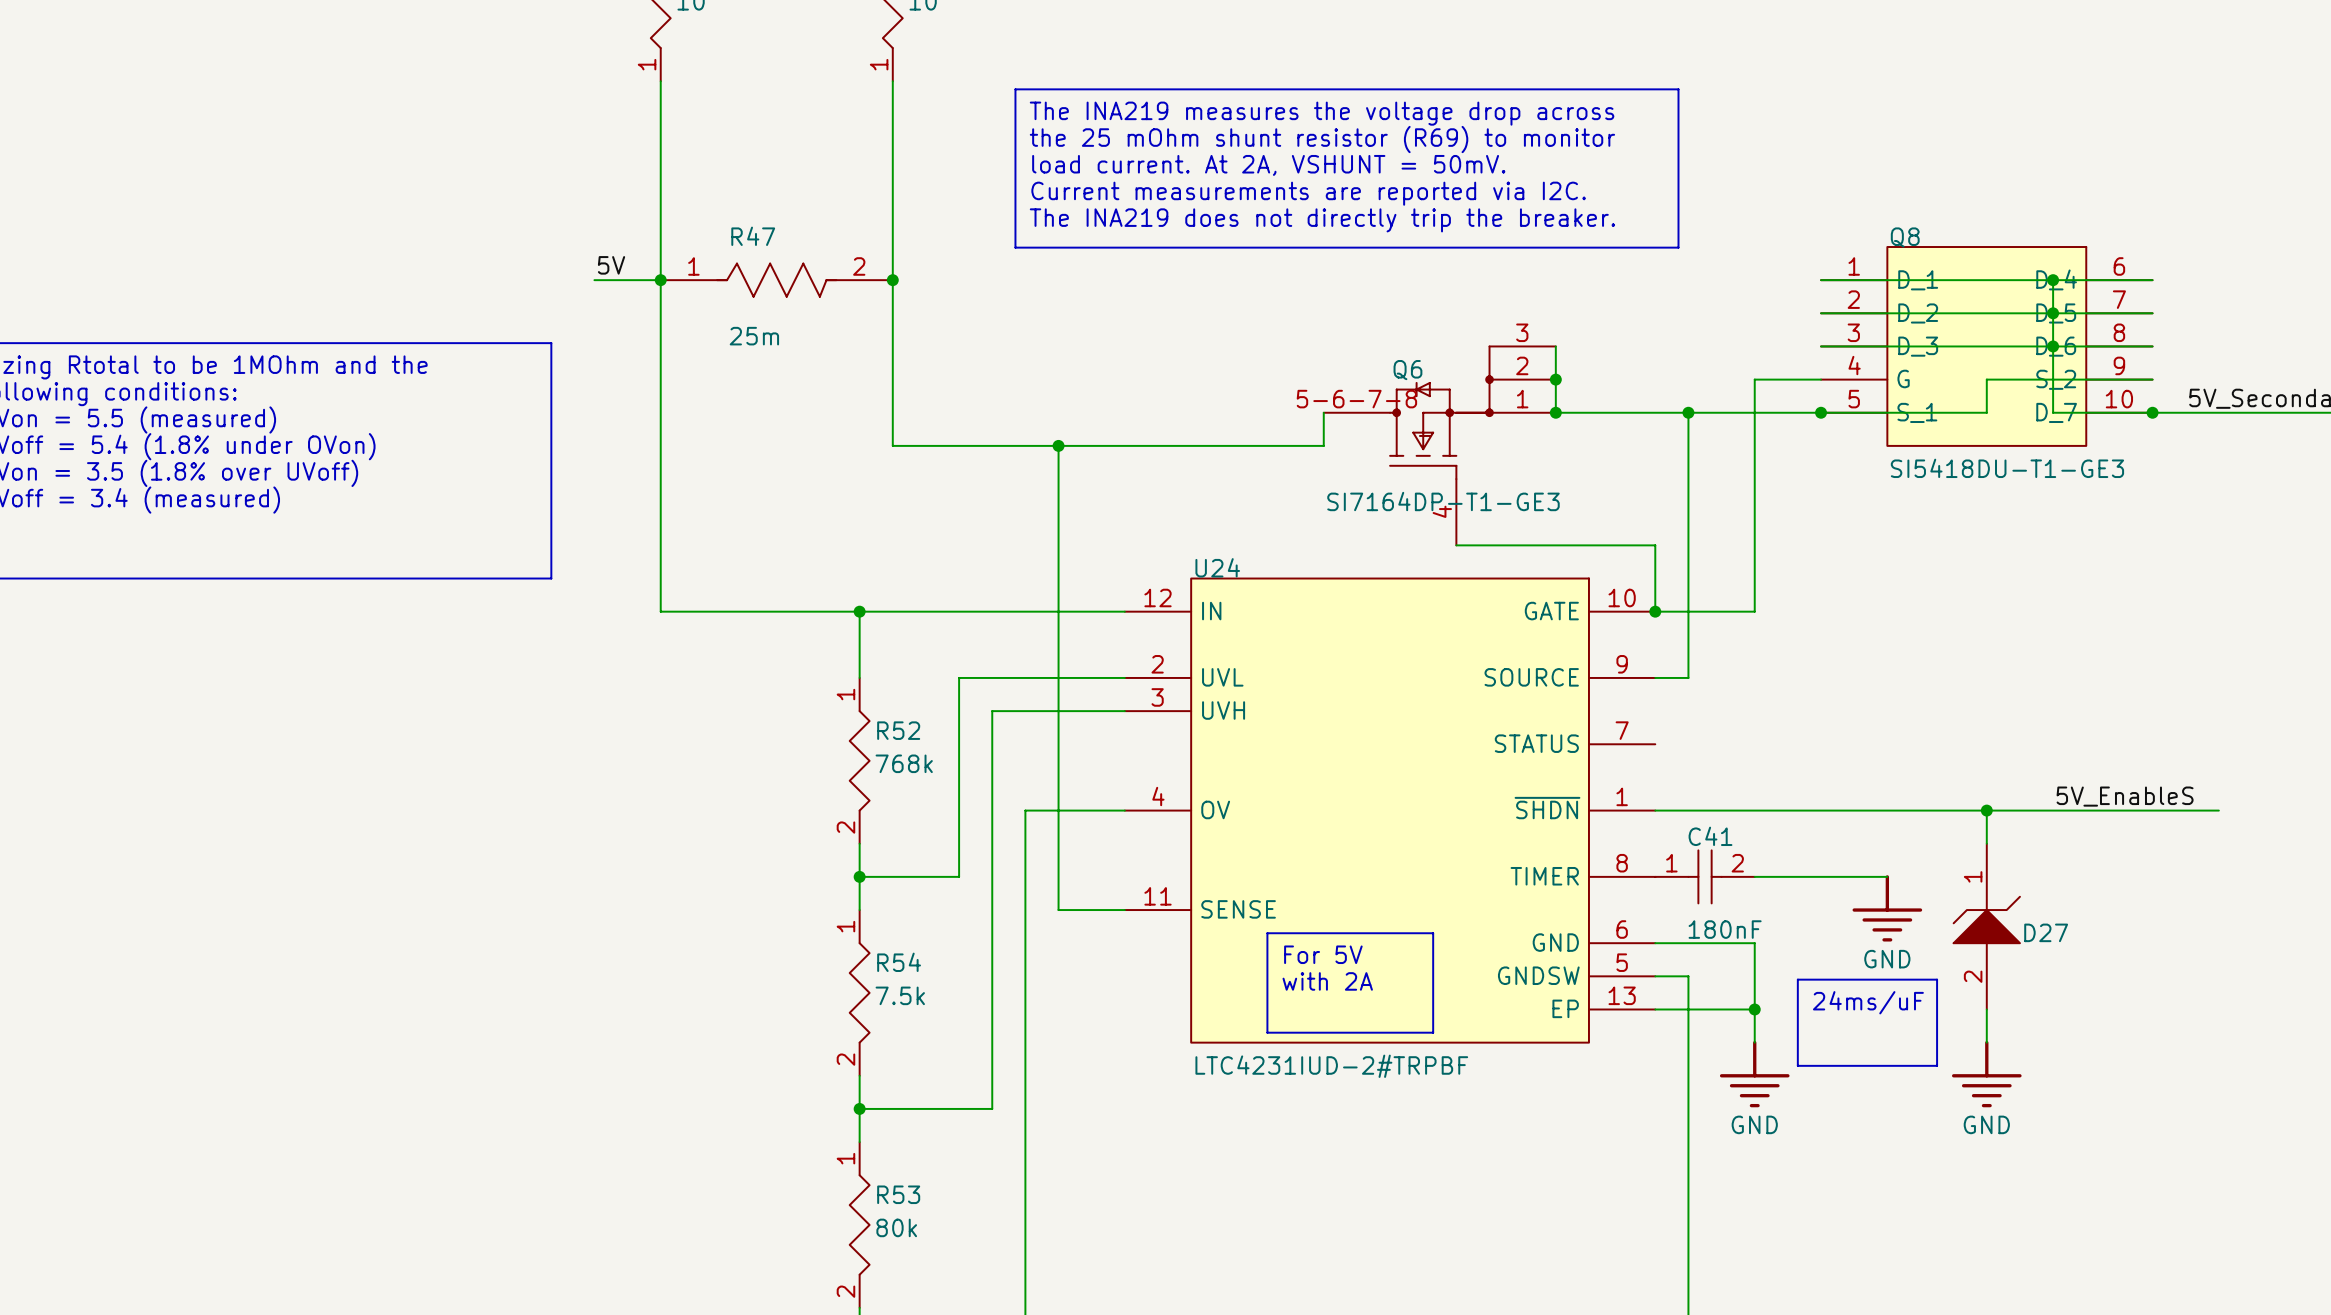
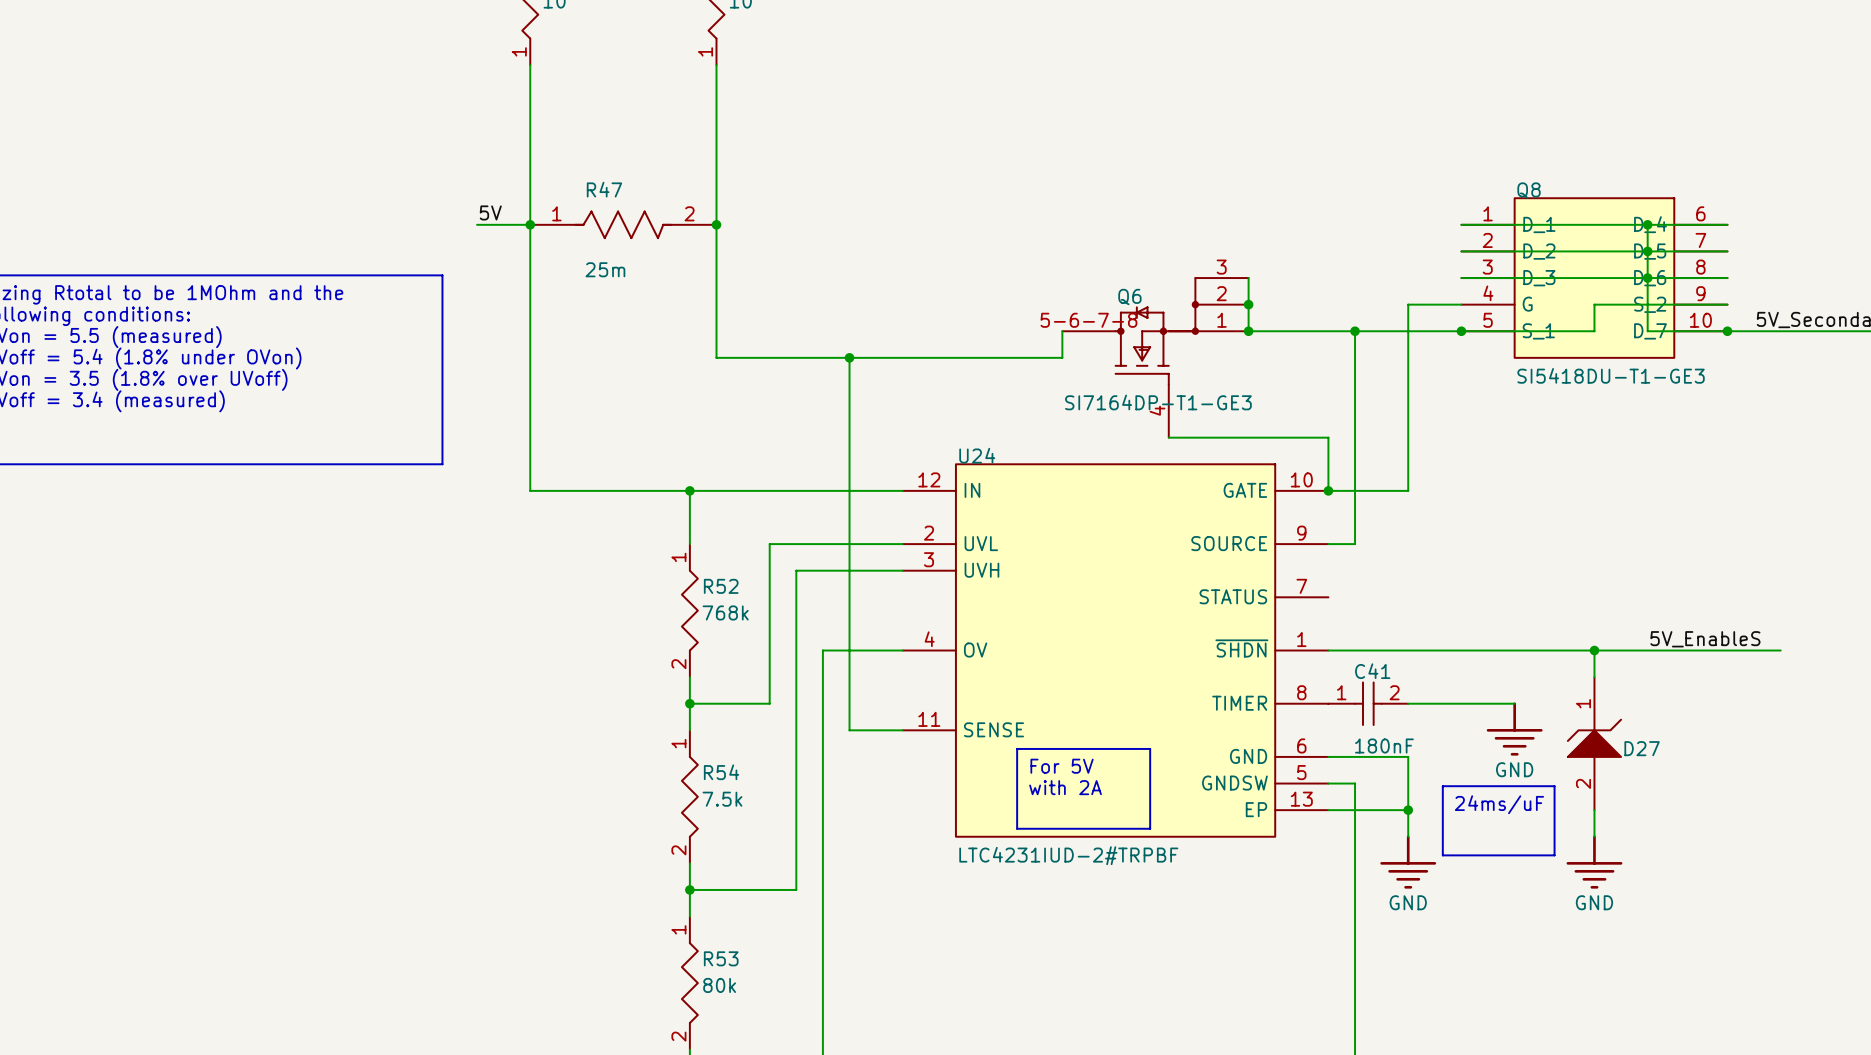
line: (1015, 89) (1678, 89) (1678, 247) (1015, 247) (1015, 89) -> none
text: The INA219 measures the voltage drop across (1322, 113) -> none
text: the 25 mOhm shunt resistor (R69) to monitor (1322, 139) -> none
text: load current. At 2A, VSHUNT = 50mV. (1268, 165) -> none
text: Current measurements are reported via I2C. (1308, 193) -> none
text: The INA219 does not directly trip the breaker. (1322, 220) -> none

